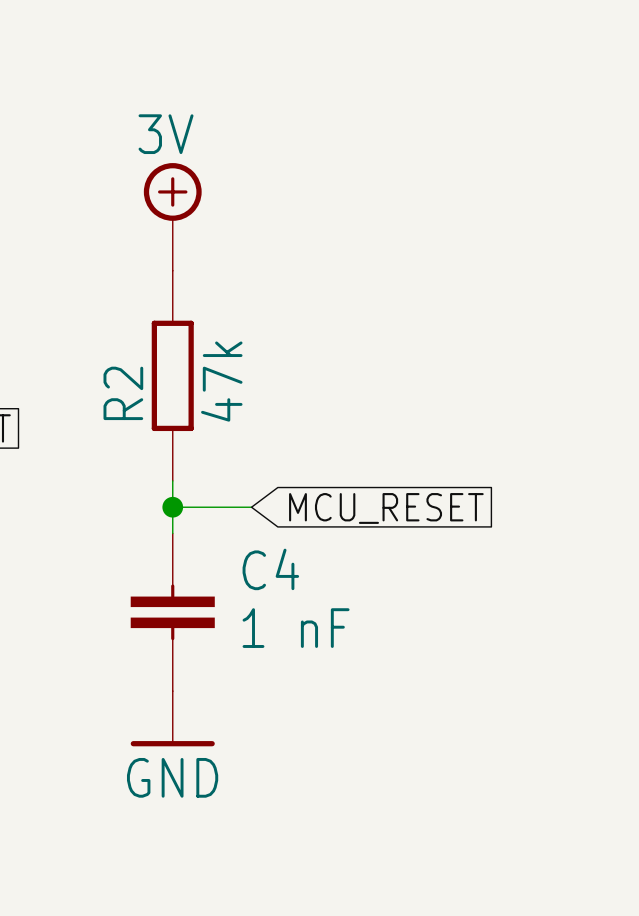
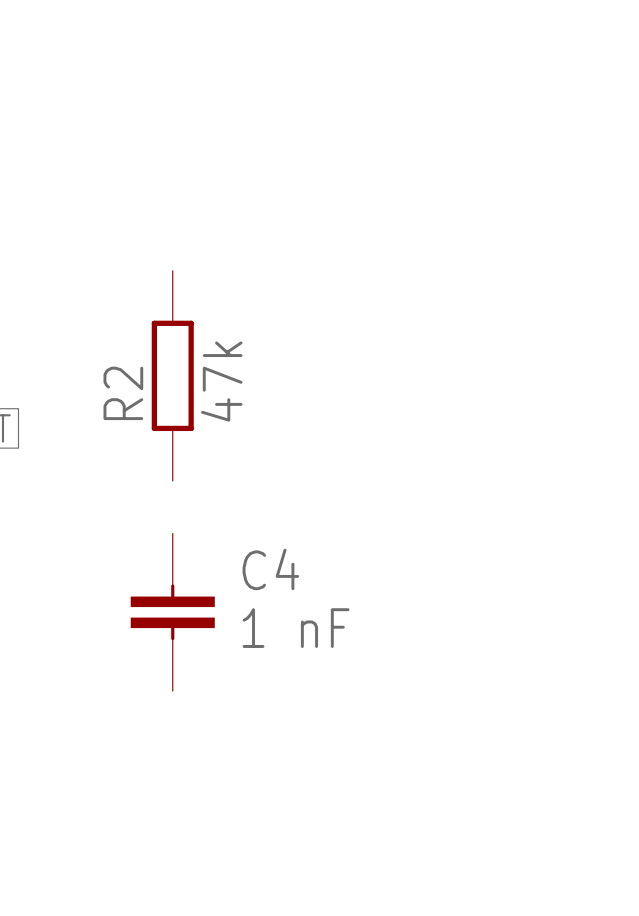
power symbol: 3V (172, 216) -> none
wire: (172, 480) (172, 533) -> none
wire: (172, 507) (251, 507) -> none
junction: (172, 507) -> none
global label: MCU_RESET (386, 508) -> none
power symbol: GND (172, 718) -> none

